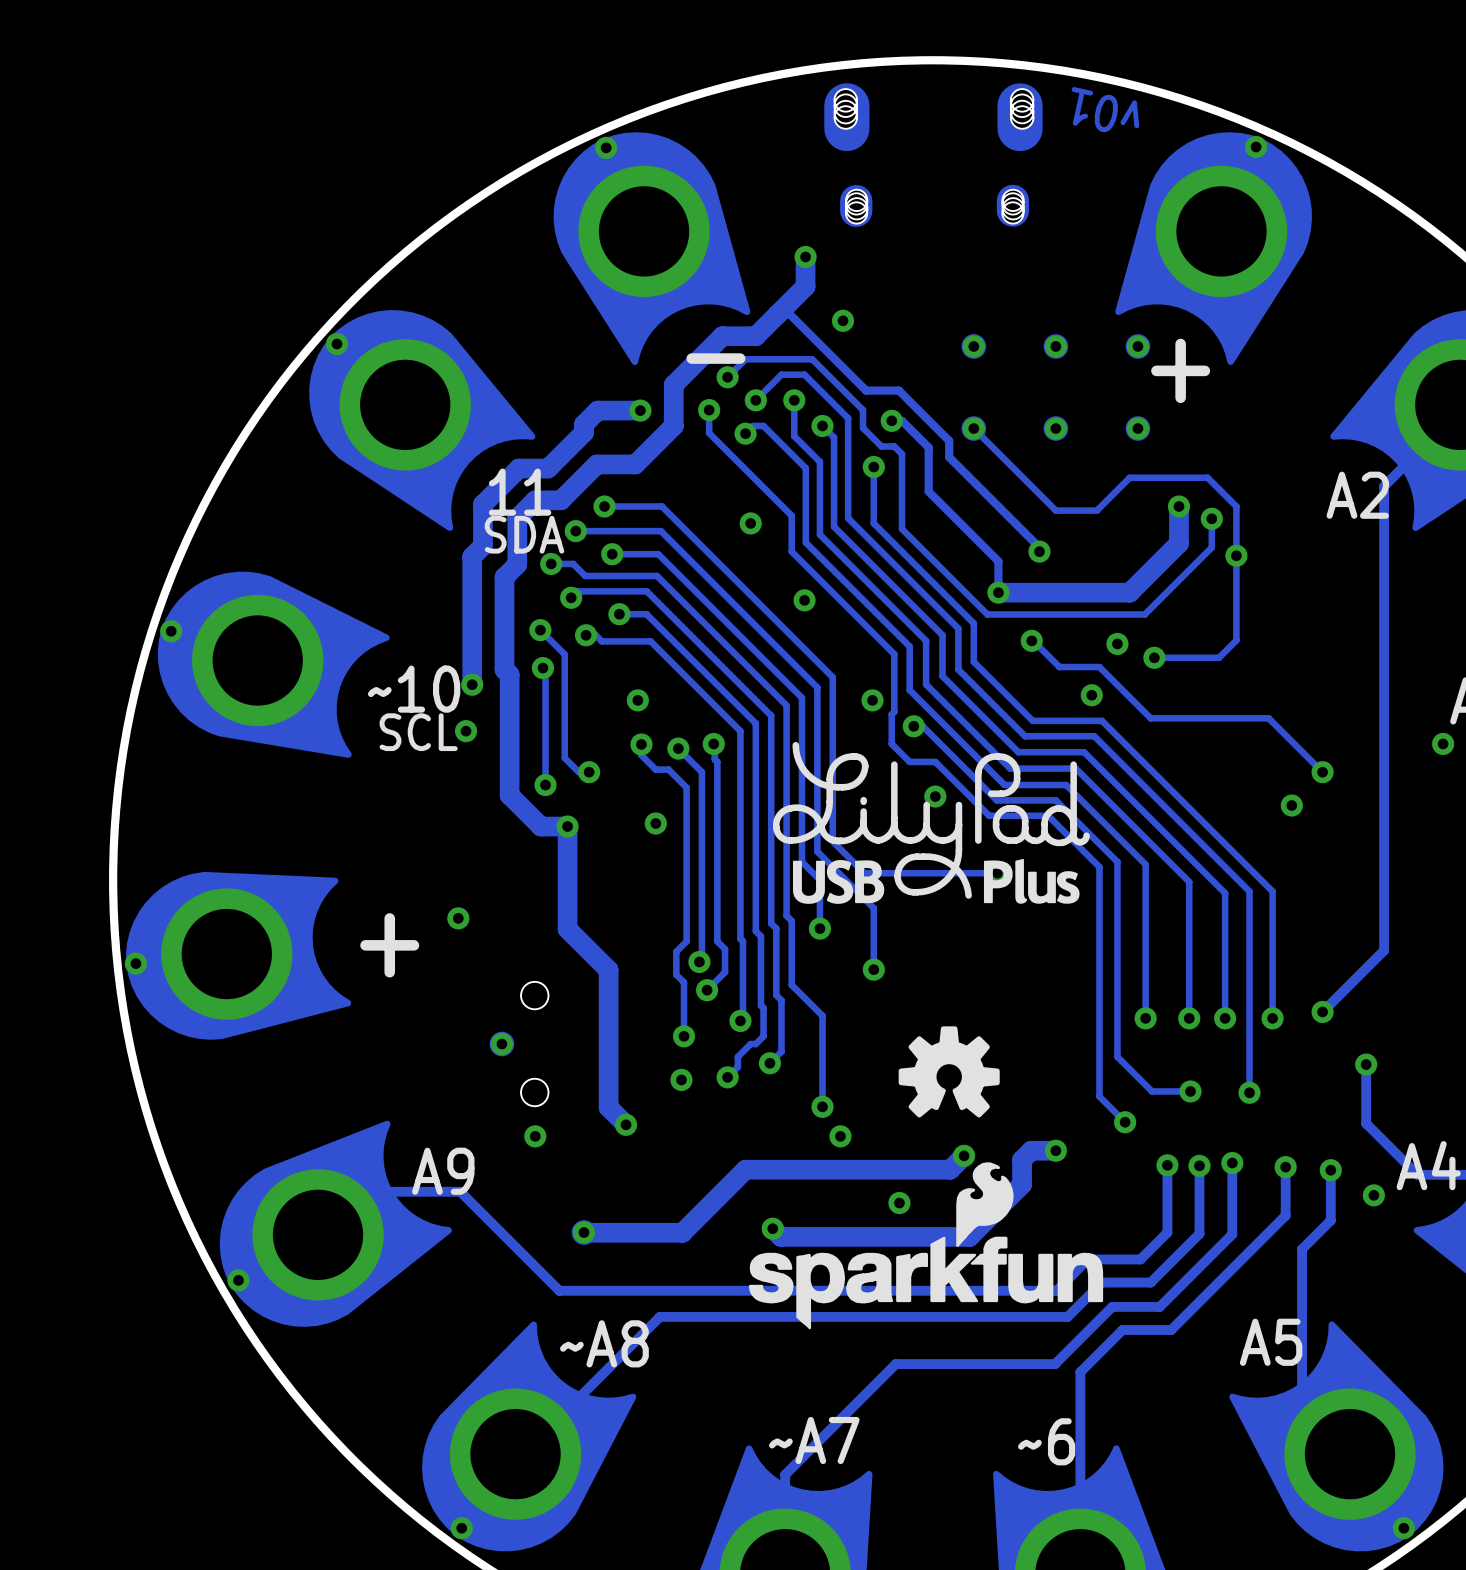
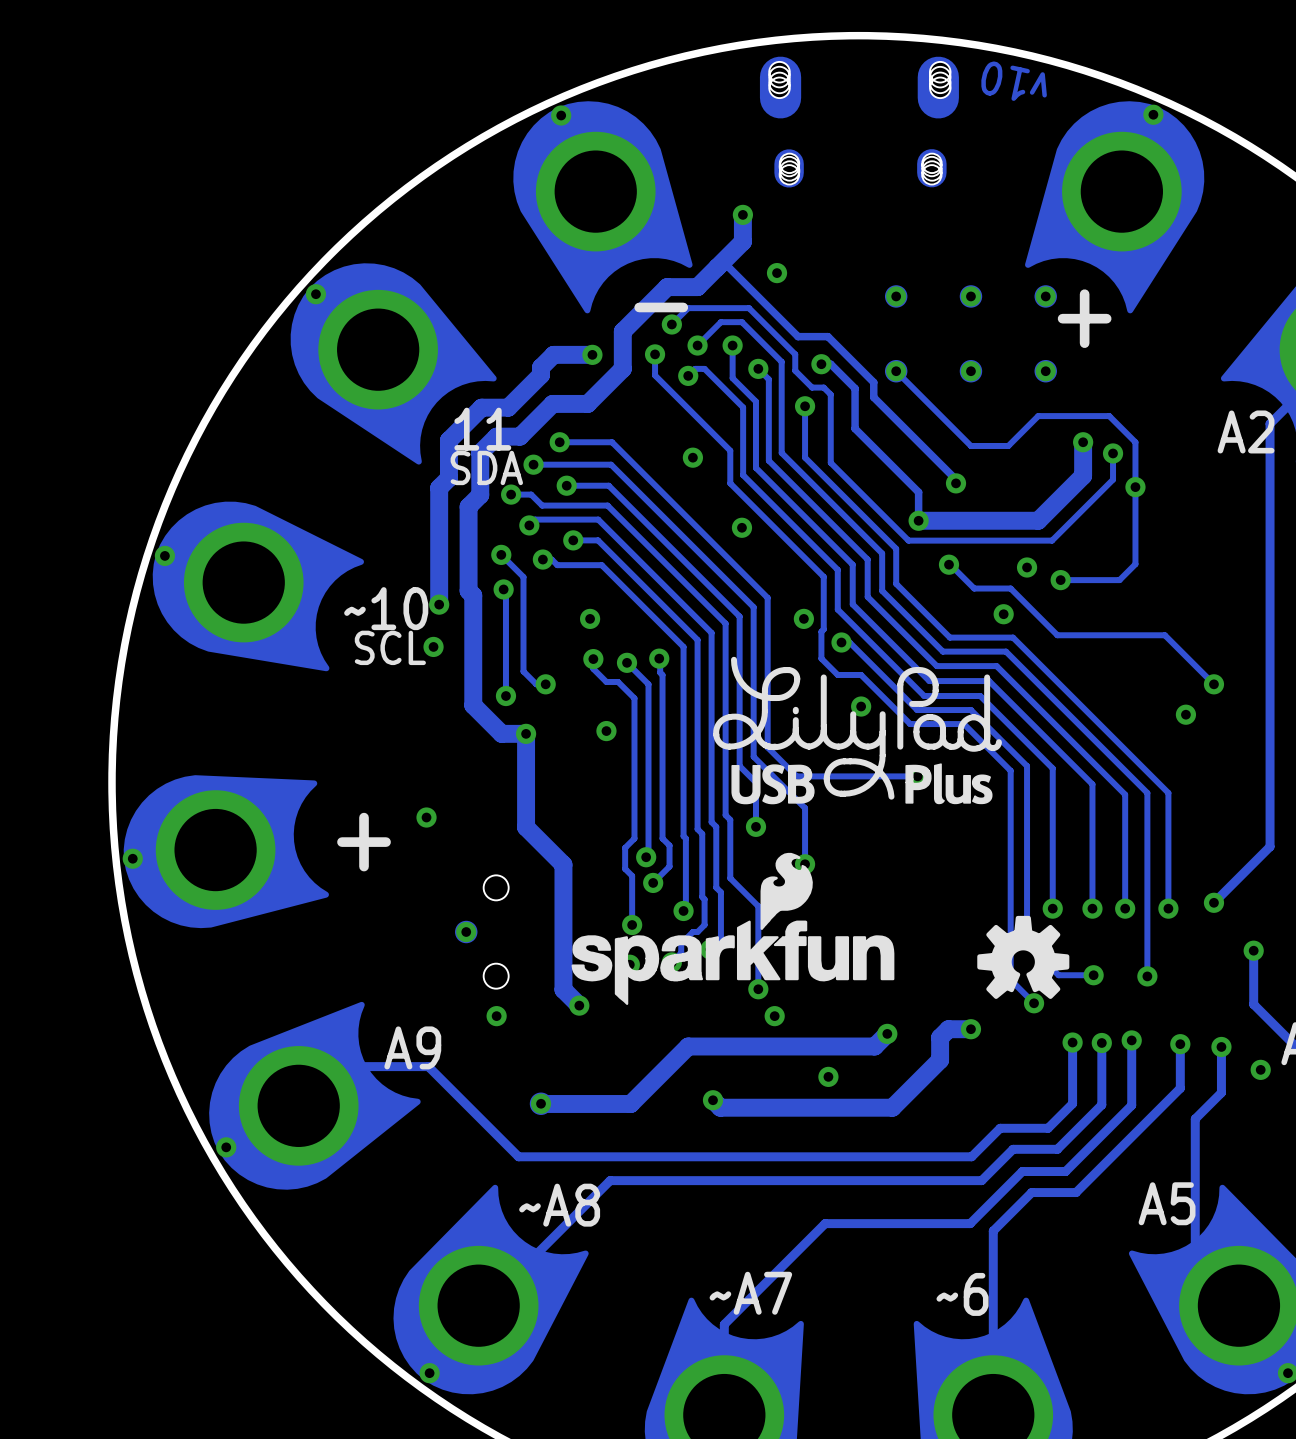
text: v01 (1105, 109) -> v10 (1014, 81)
drawing position: (949, 1071) -> (1023, 957)
drawing position: (925, 1245) -> (732, 928)

